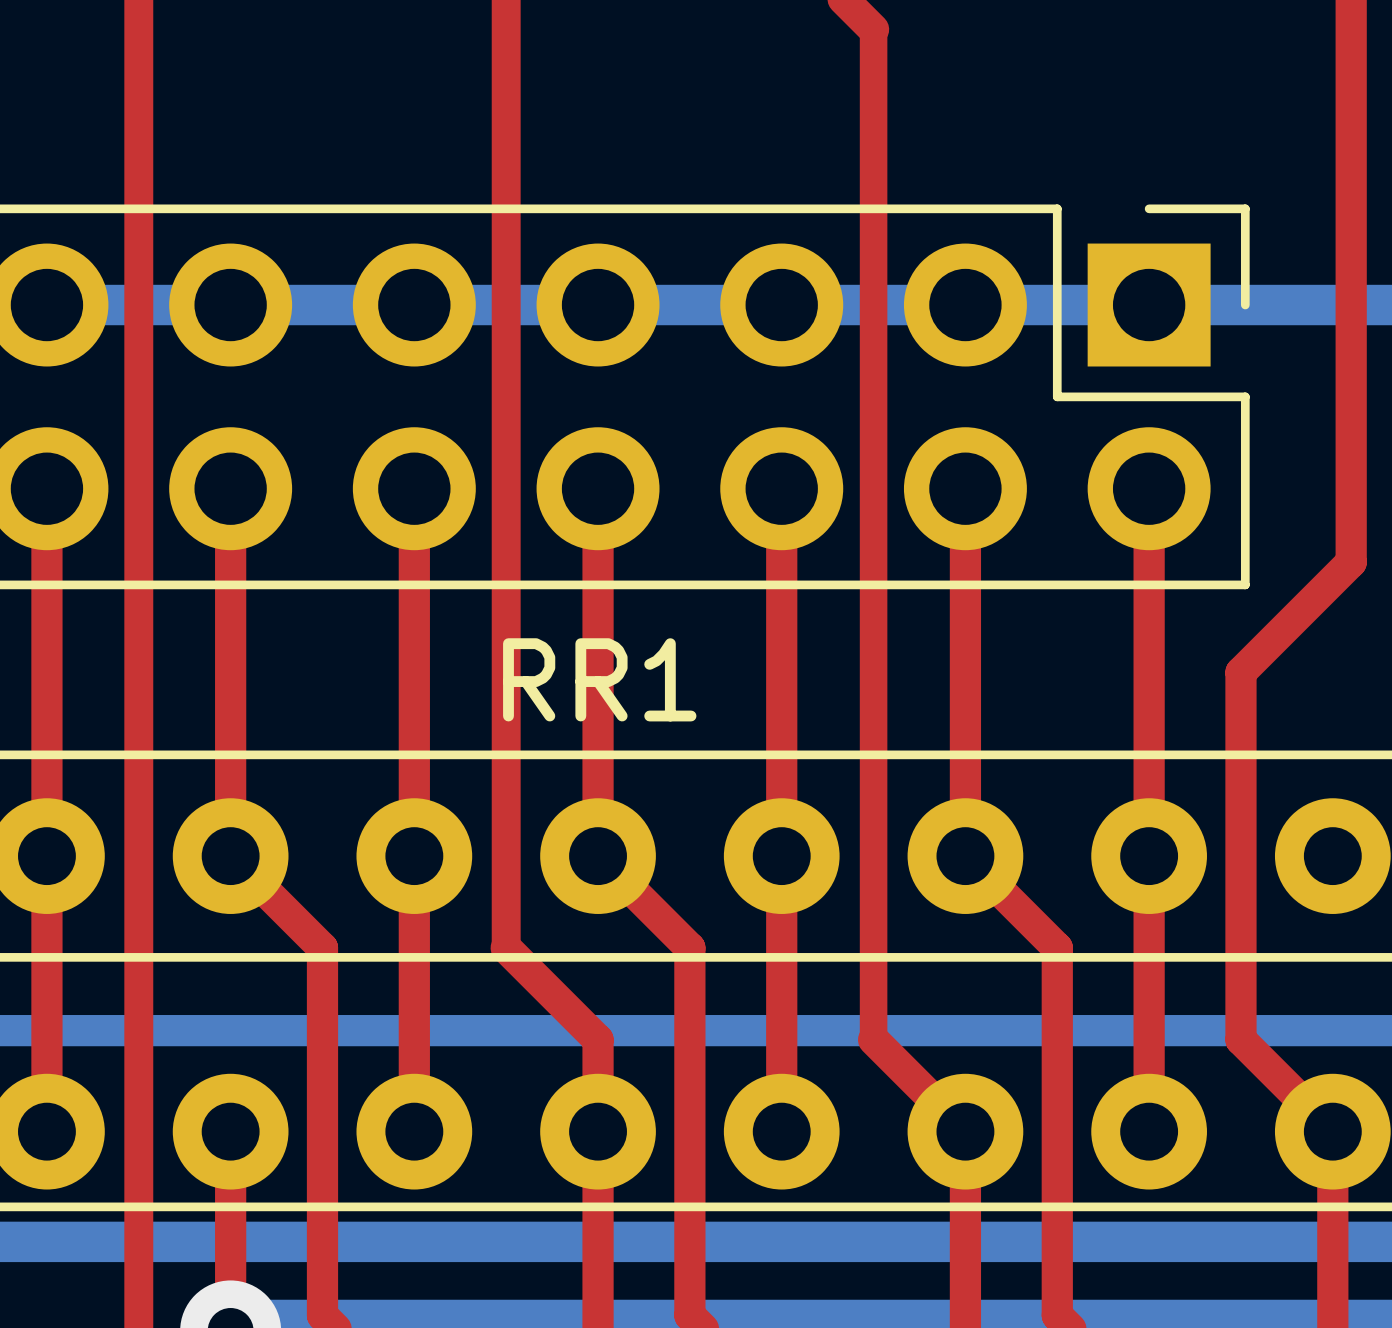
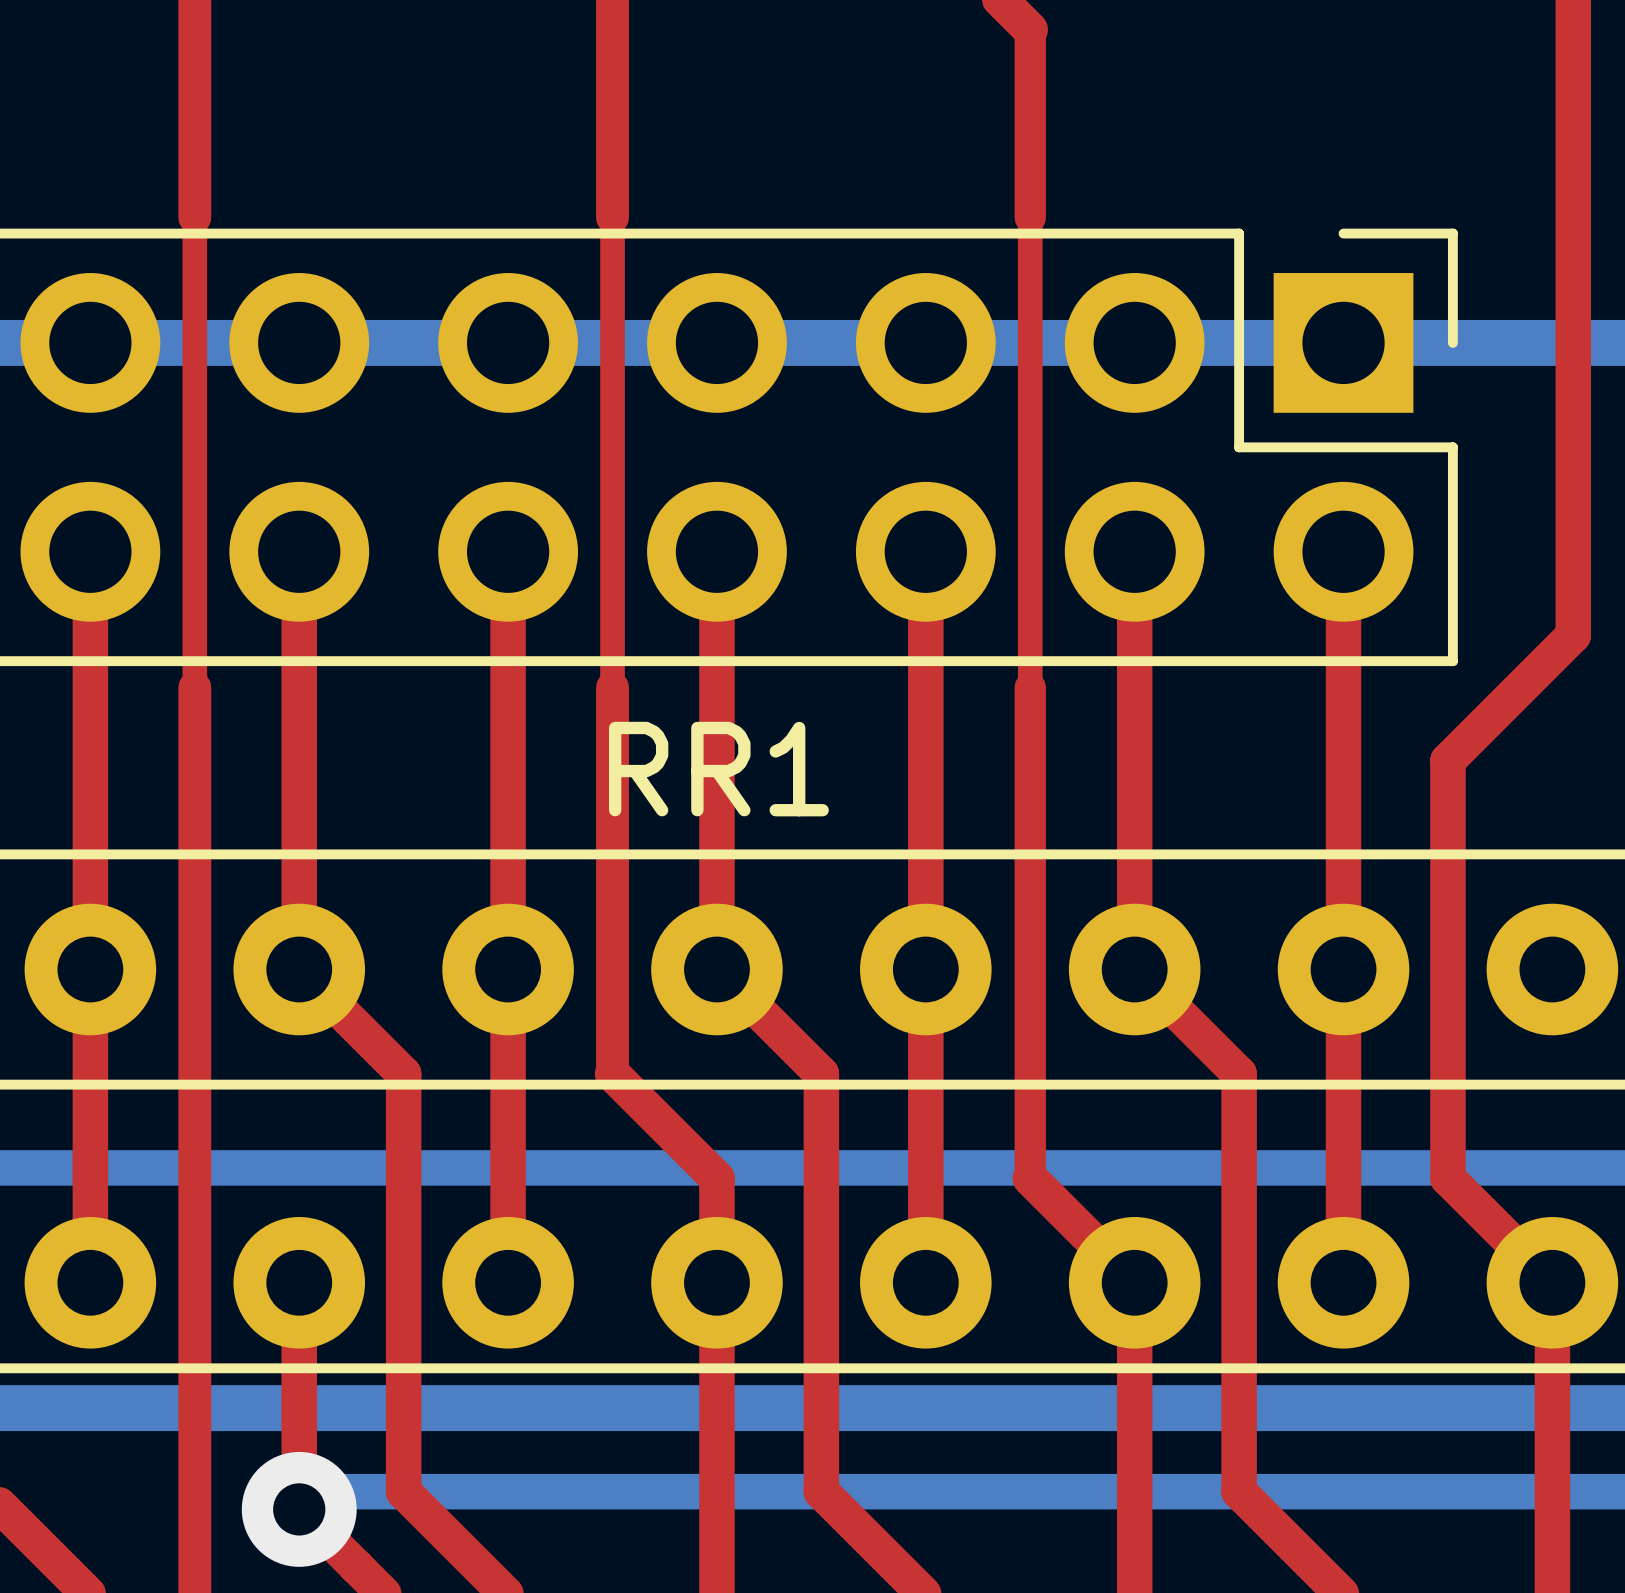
top track width: thick (138, 194) (138, 608) -> thin (194, 217) (194, 687)
top track width: thick (506, 194) (506, 608) -> thin (612, 217) (612, 687)
top track width: thick (873, 194) (873, 608) -> thin (1030, 217) (1030, 687)

